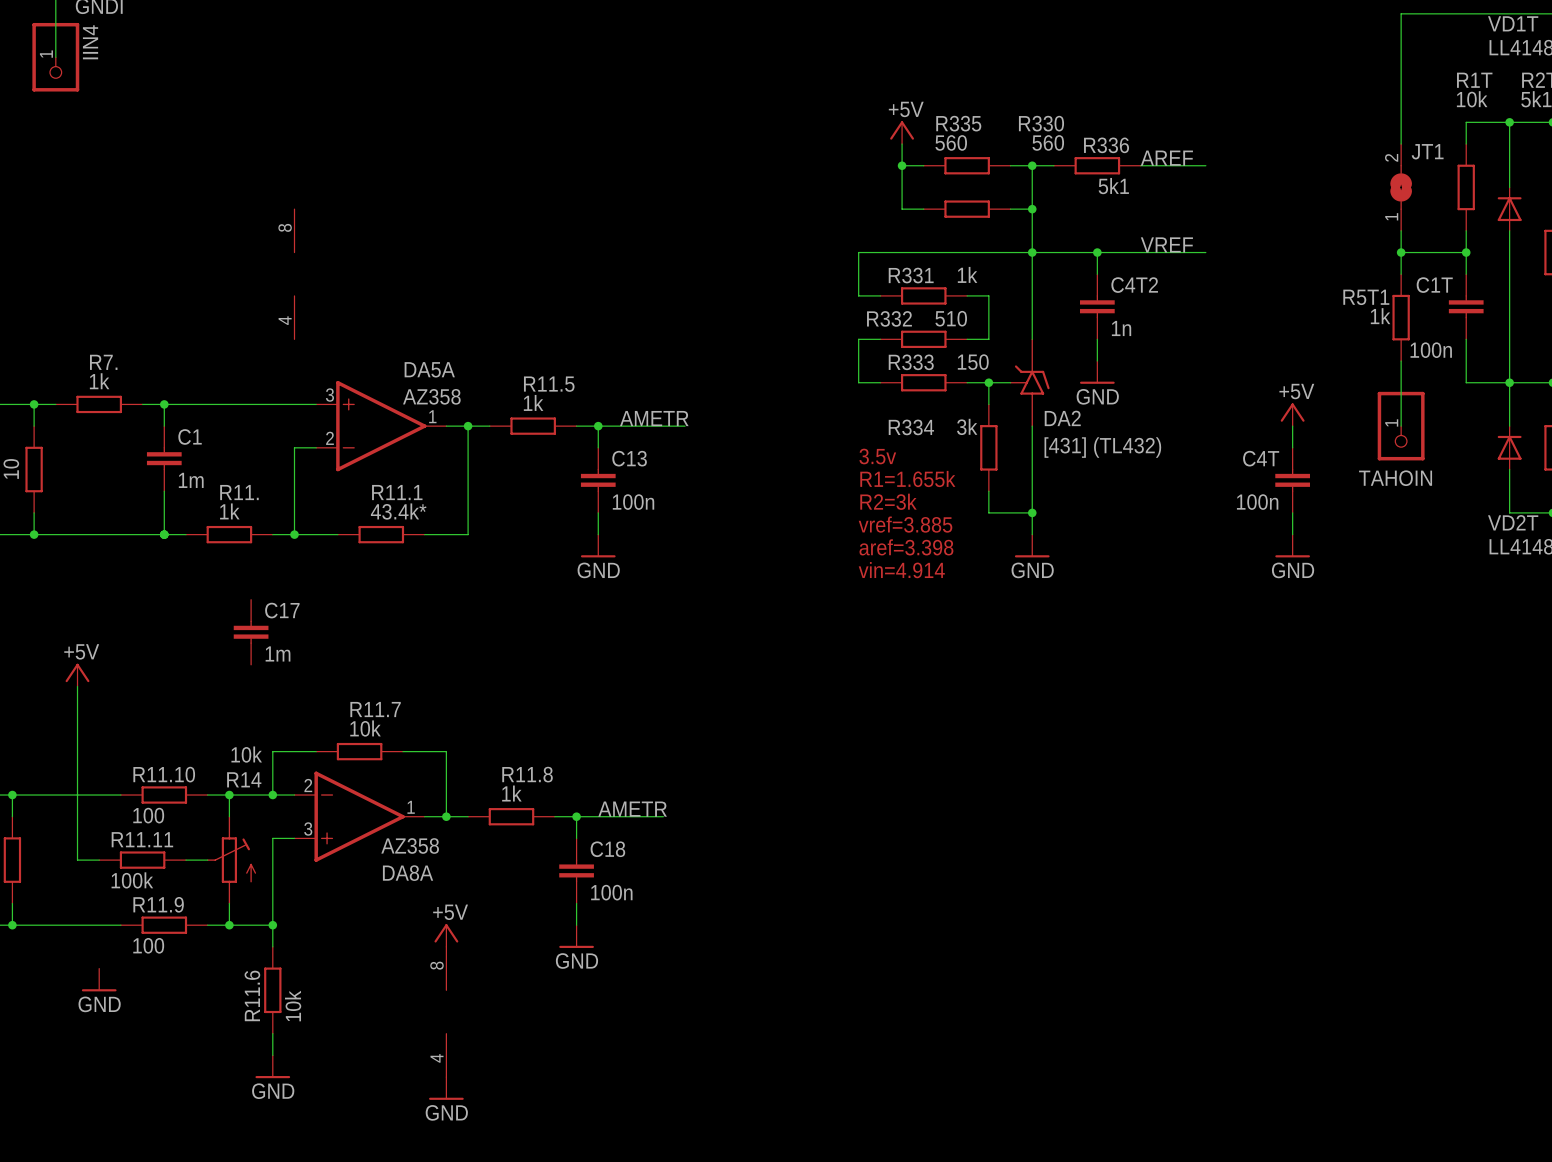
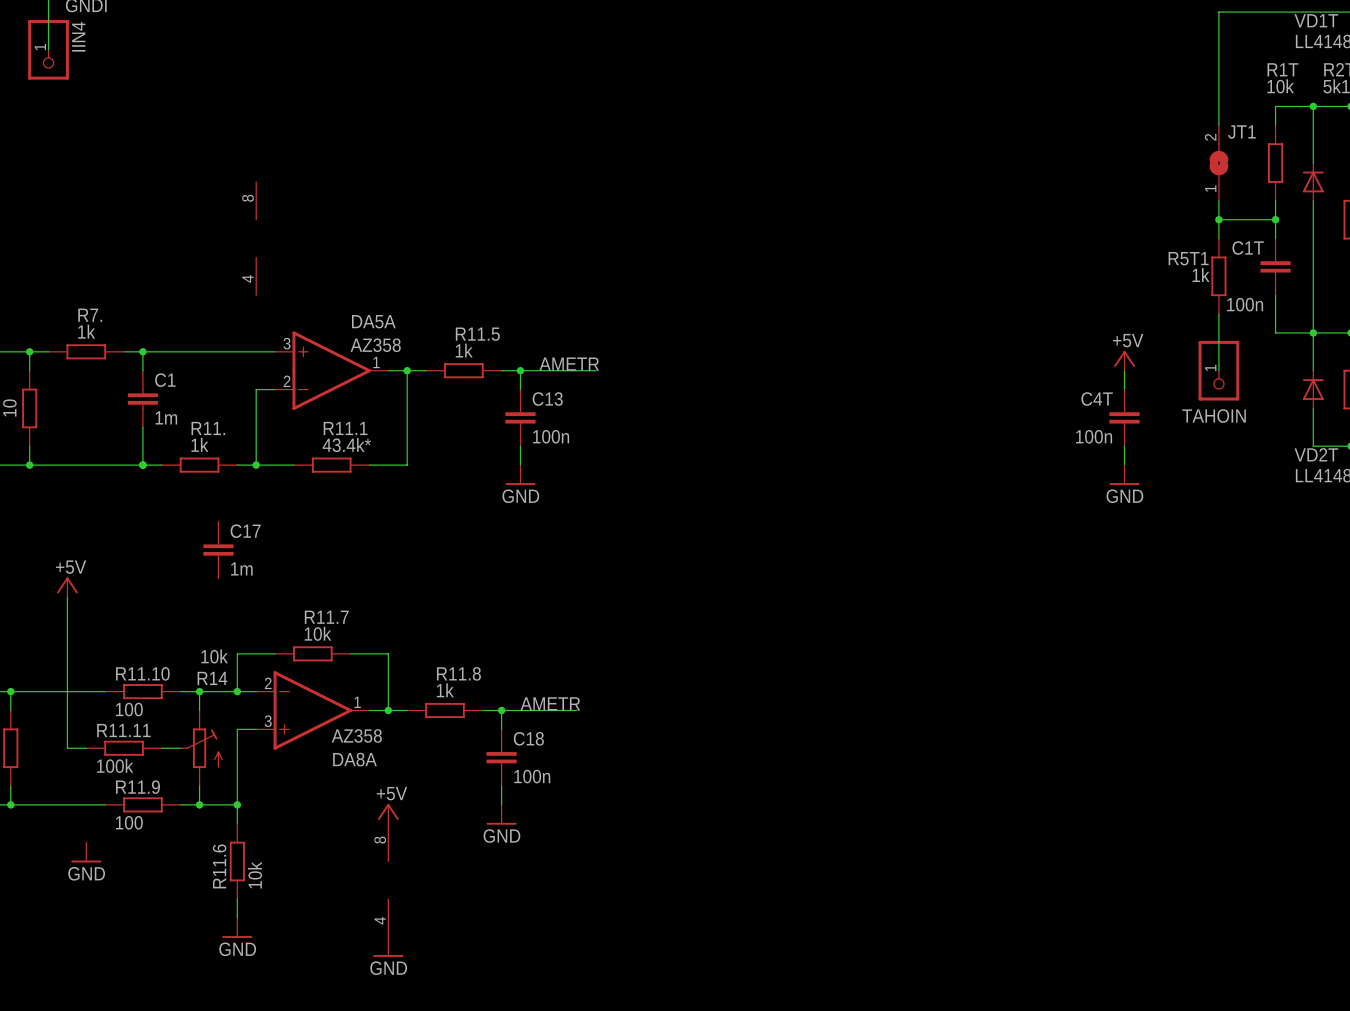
power symbol: +5V (902, 132) -> none
wire: (902, 144) (902, 209) (923, 209) -> none
label: AREF (1166, 158) -> none
wire: (902, 165) (923, 165) -> none
junction: (902, 165) -> none
R335: 560 (967, 165) -> none
wire: (1010, 165) (1053, 165) -> none
wire: (1032, 165) (1032, 339) -> none
junction: (1032, 165) -> none
R336: 5k1 (1097, 165) -> none
wire: (1140, 165) (1205, 165) -> none
R330: 560 (967, 209) -> none
wire: (1010, 209) (1032, 209) -> none
junction: (1032, 209) -> none
label: VREF (1166, 244) -> none
junction: (1032, 252) -> none
wire: (1097, 252) (1097, 274) -> none
junction: (1097, 252) -> none
wire: (1205, 252) (858, 252) (858, 295) (880, 295) -> none
R331: 1k (923, 295) -> none
wire: (967, 295) (988, 295) (988, 339) (967, 339) -> none
C4T2: 1n (1097, 306) -> none
wire: (880, 339) (858, 339) (858, 382) (880, 382) -> none
R332: 510 (923, 339) -> none
wire: (1097, 339) (1097, 361) -> none
power symbol: GND (1097, 372) -> none
R333: 150 (923, 382) -> none
wire: (967, 382) (1010, 382) -> none
wire: (988, 382) (988, 404) -> none
junction: (988, 382) -> none
DA2: [431] (TL432) (1029, 382) -> none
wire: (1032, 426) (1032, 534) -> none
R334: 3k (988, 447) -> none
text: 3.5v (877, 456) -> none
text: R1=1.655k (907, 478) -> none
wire: (988, 491) (988, 512) (1032, 512) -> none
text: R2=3k (888, 501) -> none
junction: (1032, 512) -> none
text: vref=3.885 (905, 524) -> none
power symbol: GND (1032, 546) -> none
text: aref=3.398 (906, 547) -> none
text: vin=4.914 (901, 570) -> none

